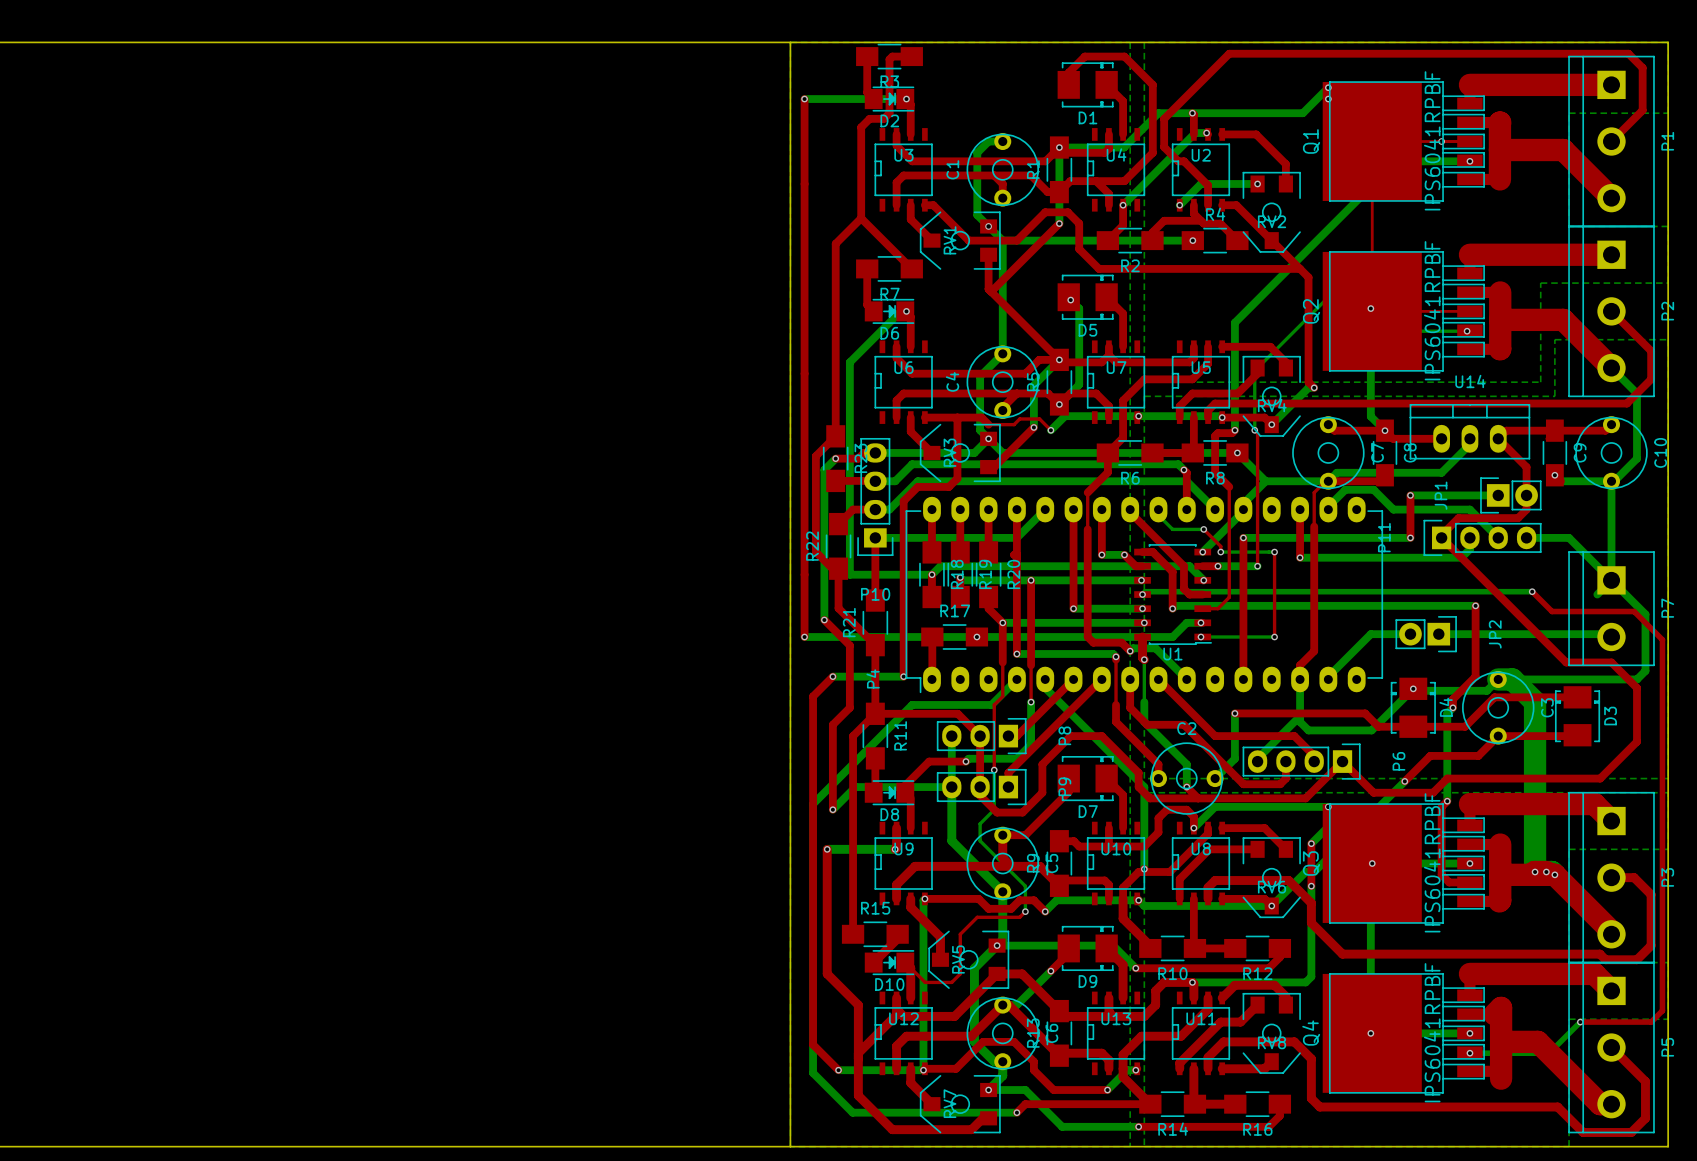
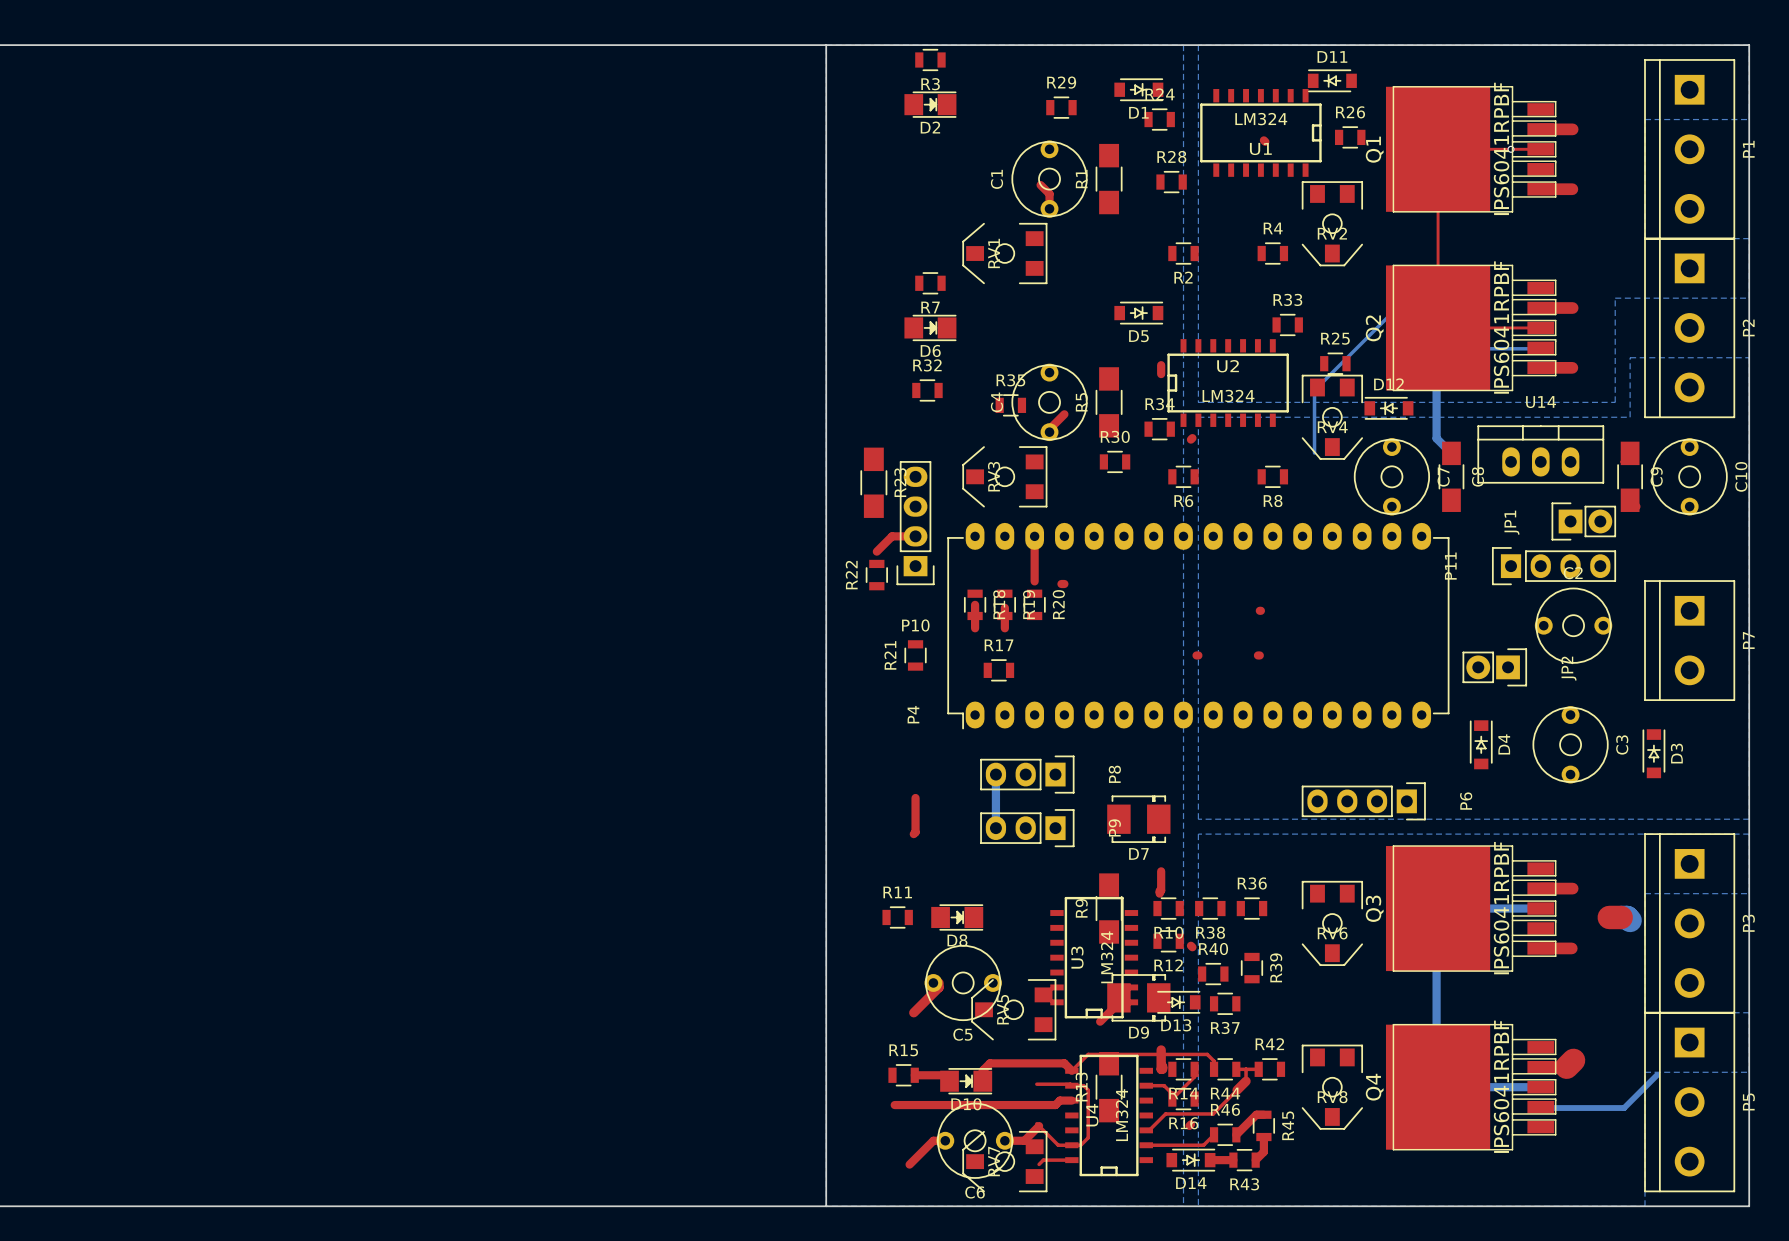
R3 footprint: [856, 43, 923, 70] -> [915, 48, 946, 72]
top track: (867, 56) (867, 92) (873, 99) -> none
top track: (911, 56) (892, 56) (889, 59) (889, 113) (883, 118) (869, 118) (861, 127) (861, 218) -> none
D1 footprint: [1057, 62, 1118, 108] -> [1114, 78, 1164, 102]
D11: none -> (1332, 80)
top track: (1068, 84) (1068, 72) (1084, 56) (1124, 56) (1152, 84) (1152, 152) (1124, 181) (1070, 181) (1059, 192) (1047, 192) (1031, 175) (903, 175) (896, 182) (896, 205) -> none
top track: (1106, 84) (1123, 101) (1123, 134) -> none
top track: (1611, 84) (1469, 84) (1469, 103) -> none
via: (1328, 87) -> none
top track: (804, 99) (804, 637) -> none
bottom track: (804, 99) (906, 99) -> none
via: (804, 99) -> none
top track: (906, 99) (910, 104) (910, 134) -> none
via: (906, 99) -> none
bottom track: (1328, 99) (1328, 87) (1302, 113) (1158, 113) (1124, 147) (1059, 147) (1059, 223) -> none
via: (1328, 99) -> none
R29: none -> (1061, 107)
U1 value: none -> LM324 (1261, 119)
R24: none -> (1159, 119)
top track: (1192, 113) (1193, 134) -> none
via: (1192, 113) -> none
top track: (1501, 121) (1499, 179) (1501, 178) -> none
U3 footprint: [874, 128, 933, 212] -> [1050, 896, 1139, 1019]
U4 footprint: [1086, 128, 1146, 212] -> [1065, 1054, 1153, 1177]
U2 footprint: [1171, 128, 1231, 212] -> [1167, 339, 1289, 427]
R26: none -> (1350, 137)
bottom track: (1206, 133) (1195, 133) (1123, 205) -> none
via: (1206, 133) -> none
top track: (896, 134) (896, 145) (912, 161) (1045, 161) (1059, 147) (1064, 152) (1104, 152) (1108, 148) (1108, 134) -> none
top track: (1222, 134) (1256, 134) (1285, 164) (1285, 183) -> none
bottom track: (1002, 141) (988, 141) (977, 152) (977, 215) (1002, 240) -> none
top track: (1611, 141) (1642, 110) (1642, 67) (1628, 53) (1229, 53) (1164, 118) (1164, 147) (1178, 161) (1183, 161) (1208, 185) (1208, 205) -> none
via: (1059, 147) -> none
top track: (1499, 150) (1563, 150) (1611, 198) -> none
bottom track: (1469, 161) (1396, 161) (1234, 322) (1234, 430) -> none
via: (1469, 161) -> none
R28: none -> (1171, 182)
top track: (1096, 181) (1108, 193) (1108, 205) -> none
bottom track: (1257, 183) (1200, 183) (1179, 205) -> none
via: (1257, 183) -> none
top track: (910, 205) (910, 219) (931, 240) -> none
top track: (924, 205) (933, 205) (968, 240) (1016, 240) (1045, 212) (1067, 212) (1079, 223) (1079, 249) (1099, 268) (1300, 268) -> none
top track: (1123, 205) (1123, 225) (1107, 240) -> none
via: (1123, 205) -> none
via: (1179, 205) -> none
top track: (1193, 205) (1193, 213) (1203, 223) (1220, 223) (1237, 240) (1237, 234) -> none
top track: (1222, 205) (1236, 205) (1308, 277) (1308, 382) (1314, 387) -> none
top track: (861, 218) (835, 243) (835, 436) (815, 456) (815, 552) (832, 568) (838, 568) (838, 608) (875, 645) (875, 713) -> none
top track: (861, 218) (911, 268) -> none
top track: (1200, 220) (1164, 220) (1152, 232) (1152, 240) -> none
top track: (1059, 223) (991, 291) -> none
via: (1059, 223) -> none
via: (988, 226) -> none
R2 footprint: [1096, 227, 1164, 254] -> [1168, 242, 1199, 265]
R4 footprint: [1181, 227, 1249, 254] -> [1257, 242, 1289, 265]
bottom track: (1002, 240) (1192, 240) -> none
bottom track: (1002, 240) (1002, 353) (980, 376) (980, 430) (1002, 452) (1237, 452) (1265, 481) -> none
via: (1192, 240) -> none
top track: (988, 254) (988, 289) (1061, 362) (1101, 362) (1108, 355) (1116, 362) (1189, 362) (1193, 358) (1193, 346) -> none
top track: (1611, 254) (1469, 254) (1469, 273) -> none
R7 footprint: [856, 256, 923, 282] -> [915, 272, 946, 295]
top track: (867, 268) (867, 304) (873, 311) -> none
D5 footprint: [1057, 274, 1118, 320] -> [1114, 301, 1164, 325]
top track: (1501, 291) (1499, 349) (1501, 348) -> none
top track: (1106, 297) (1123, 313) (1123, 346) -> none
bottom track: (1070, 300) (1079, 308) (1079, 384) (1059, 404) -> none
via: (1070, 300) -> none
R33: none -> (1287, 324)
via: (1370, 308) -> none
top track: (906, 311) (910, 316) (910, 346) -> none
bottom track: (906, 311) (900, 311) (849, 362) (849, 574) (931, 574) (940, 566) (1189, 566) (1203, 580) -> none
via: (906, 311) -> none
top track: (1611, 311) (1651, 351) (1651, 379) (1626, 403) (1215, 403) (1208, 410) (1208, 417) -> none
top track: (1500, 319) (1563, 319) (1611, 368) -> none
via: (1467, 331) -> none
R25: none -> (1335, 363)
top track: (896, 346) (896, 358) (912, 373) (1025, 373) (1039, 359) (1059, 359) -> none
top track: (1208, 346) (1208, 363) (1192, 379) (1144, 379) (1123, 400) (1123, 437) (1107, 452) (1107, 472) (1087, 492) (1087, 637) (1093, 642) (1121, 642) (1130, 651) -> none
top track: (1222, 346) (1270, 346) (1285, 362) (1285, 368) -> none
bottom track: (1059, 359) (1033, 385) (1033, 427) -> none
via: (1059, 359) -> none
top track: (1257, 368) (1257, 373) (1237, 393) (1192, 393) (1179, 406) (1179, 417) -> none
bottom track: (1611, 368) (1636, 393) (1636, 458) (1614, 481) (1560, 481) (1554, 475) -> none
R32: none -> (927, 390)
U2 value: none -> LM324 (1228, 395)
U6: (903, 382) -> none
U7: (1116, 382) -> none
U5: (1200, 382) -> none
R35: none -> (1010, 405)
bottom track: (1314, 387) (1308, 387) (1271, 424) -> none
via: (1314, 387) -> none
D12: none -> (1388, 408)
via: (1059, 404) -> none
R34: none -> (1159, 429)
via: (1138, 416) -> none
top track: (896, 417) (896, 400) (903, 393) (1048, 393) (1059, 404) (1070, 393) (1096, 393) (1108, 406) (1108, 417) -> none
top track: (910, 417) (910, 431) (931, 452) -> none
top track: (924, 417) (981, 417) (988, 424) (1014, 424) (1019, 418) (1039, 418) (1050, 430) -> none
top track: (957, 417) (957, 478) (948, 486) (917, 486) (903, 501) (903, 676) -> none
top track: (1193, 417) (1193, 451) -> none
top track: (1222, 417) (1264, 417) (1271, 424) -> none
bottom track: (1222, 417) (1065, 416) (1050, 430) -> none
via: (1222, 417) -> none
via: (1271, 424) -> none
top track: (1328, 424) (1334, 430) (1385, 430) (1393, 438) -> none
top track: (1611, 424) (1605, 430) (1506, 430) (1498, 438) (1526, 467) (1526, 509) (1518, 518) (1458, 518) (1441, 535) (1441, 537) (1566, 662) (1611, 662) (1636, 687) (1636, 741) (1600, 778) (1447, 778) (1433, 792) (1373, 792) (1342, 761) (1305, 798) (1149, 798) (1138, 787) (1138, 772) (1101, 736) (1070, 736) (1042, 764) (1042, 792) (1022, 812) (997, 812) (980, 795) (980, 736) (957, 713) (875, 713) -> none
top track: (1033, 427) (994, 467) (988, 467) -> none
via: (1033, 427) -> none
via: (1050, 430) -> none
top track: (1234, 430) (1232, 433) (1217, 433) (1215, 435) (1215, 472) (1229, 486) (1229, 597) (1217, 608) (1202, 608) -> none
via: (1234, 430) -> none
top track: (1254, 430) (1257, 433) (1257, 566) -> none
via: (1254, 430) -> none
via: (1385, 430) -> none
bottom track: (988, 438) (974, 452) (875, 452) -> none
via: (988, 438) -> none
R30: none -> (1115, 461)
top track: (1393, 438) (1441, 438) -> none
bottom track: (1469, 438) (1469, 444) (1441, 472) (1336, 472) (1328, 481) (1265, 481) -> none
R6 footprint: [1096, 440, 1164, 466] -> [1168, 465, 1199, 488]
R8 footprint: [1181, 440, 1249, 466] -> [1257, 465, 1289, 488]
top track: (875, 452) (864, 452) (858, 458) (835, 458) -> none
top track: (1152, 452) (1192, 452) -> none
via: (1237, 452) -> none
bottom track: (835, 458) (824, 469) (824, 620) -> none
via: (835, 458) -> none
top track: (1183, 469) (1186, 472) (1186, 509) -> none
bottom track: (1183, 469) (1178, 464) (912, 464) (895, 481) (875, 481) -> none
via: (1183, 469) -> none
top track: (1385, 475) (1378, 481) (1325, 481) (1314, 492) (1314, 651) (1300, 665) (1300, 679) -> none
via: (1554, 475) -> none
top track: (835, 480) (875, 481) -> none
bottom track: (1265, 481) (1243, 503) (1243, 511) (1202, 552) -> none
bottom track: (1611, 481) (1611, 580) (1597, 594) -> none
top track: (1410, 495) (1410, 537) -> none
bottom track: (1410, 495) (1498, 495) -> none
via: (1410, 495) -> none
bottom track: (875, 509) (889, 509) (917, 481) (1186, 481) (1215, 509) -> none
top track: (931, 509) (931, 552) -> none
top track: (960, 509) (960, 552) -> none
top track: (1016, 509) (1016, 653) -> none
bottom track: (1045, 509) (1016, 537) (875, 537) -> none
top track: (1073, 509) (1073, 608) -> none
top track: (1101, 509) (1101, 554) -> none
top track: (1130, 509) (1130, 512) (1183, 566) (1183, 588) (1189, 594) (1202, 594) -> none
bottom track: (1158, 509) (1158, 515) (1172, 529) (1203, 529) -> none
top track: (1300, 509) (1300, 557) -> none
bottom track: (1328, 509) (1328, 506) (1345, 489) (1373, 489) (1393, 509) (1469, 509) (1498, 537) -> none
R22 footprint: [825, 512, 852, 580] -> [865, 559, 888, 591]
top track: (1203, 529) (1220, 546) (1220, 552) -> none
via: (1203, 529) -> none
top track: (875, 537) (875, 600) -> none
top track: (1243, 537) (1243, 679) -> none
bottom track: (1243, 537) (1410, 537) -> none
via: (1243, 537) -> none
via: (1410, 537) -> none
bottom track: (1469, 537) (1469, 549) (1461, 557) (1300, 557) -> none
bottom track: (1526, 537) (1569, 537) (1645, 614) (1645, 670) (1636, 679) (1498, 679) -> none
R18 footprint: [919, 541, 945, 609] -> [963, 589, 987, 621]
R19 footprint: [947, 541, 974, 609] -> [993, 589, 1017, 621]
R20 footprint: [975, 541, 1002, 609] -> [1023, 589, 1046, 621]
U1 footprint: [1134, 544, 1212, 645] -> [1200, 89, 1322, 177]
top track: (1142, 552) (1152, 552) (1172, 571) (1172, 608) -> none
via: (1202, 552) -> none
bottom track: (1220, 552) (1274, 552) -> none
via: (1220, 552) -> none
top track: (1274, 552) (1274, 637) -> none
via: (1274, 552) -> none
bottom track: (1101, 554) (1124, 554) -> none
via: (1101, 554) -> none
top track: (1124, 554) (1135, 566) (1142, 566) -> none
via: (1124, 554) -> none
via: (1300, 557) -> none
top track: (1202, 566) (1217, 566) -> none
bottom track: (1217, 566) (1257, 566) -> none
via: (1217, 566) -> none
via: (1257, 566) -> none
via: (931, 574) -> none
bottom track: (960, 577) (963, 580) (1141, 580) -> none
via: (960, 577) -> none
top track: (1031, 580) (1031, 702) -> none
via: (1031, 580) -> none
via: (1141, 580) -> none
via: (1203, 580) -> none
R21 footprint: [862, 589, 889, 657] -> [904, 640, 927, 671]
top track: (1532, 591) (1552, 611) (1634, 611) (1662, 639) (1662, 1010) (1651, 1022) (1580, 1022) -> none
bottom track: (1532, 591) (1145, 591) (1142, 594) -> none
via: (1532, 591) -> none
via: (1142, 594) -> none
top track: (988, 597) (988, 608) (1002, 622) (1002, 696) (994, 704) (994, 770) -> none
top track: (1475, 605) (1475, 676) (1452, 699) (1452, 707) -> none
bottom track: (1475, 605) (1175, 605) (1172, 608) -> none
via: (1475, 605) -> none
bottom track: (1073, 608) (1142, 608) -> none
via: (1073, 608) -> none
via: (1142, 608) -> none
via: (1172, 608) -> none
top track: (824, 620) (849, 645) (849, 707) (832, 724) (832, 809) -> none
via: (824, 620) -> none
bottom track: (1002, 622) (1144, 622) -> none
via: (1002, 622) -> none
via: (1144, 622) -> none
bottom track: (1200, 622) (1186, 622) (1172, 637) (804, 637) -> none
via: (1200, 622) -> none
R17 footprint: [921, 624, 989, 650] -> [983, 659, 1015, 682]
bottom track: (1410, 634) (1370, 634) (1328, 676) (1328, 679) -> none
bottom track: (1438, 634) (1608, 634) (1611, 637) -> none
via: (804, 637) -> none
top track: (932, 637) (931, 679) -> none
via: (976, 637) -> none
top track: (1142, 637) (1142, 657) (1144, 659) -> none
bottom track: (1200, 637) (1274, 637) -> none
via: (1200, 637) -> none
via: (1274, 637) -> none
bottom track: (1130, 651) (1133, 648) (1155, 648) (1186, 679) -> none
via: (1130, 651) -> none
bottom track: (1016, 653) (1113, 653) (1116, 656) -> none
via: (1016, 653) -> none
U1 name position: U1 (1172, 654) -> U1 (1260, 148)
top track: (1116, 656) (1116, 721) (1158, 764) (1158, 778) -> none
via: (1116, 656) -> none
bottom track: (1144, 659) (1144, 721) (1186, 764) (1186, 787) -> none
via: (1144, 659) -> none
top track: (832, 676) (813, 696) (813, 1044) (838, 1070) -> none
bottom track: (832, 676) (903, 676) -> none
via: (832, 676) -> none
via: (903, 676) -> none
D4 footprint: [1390, 677, 1436, 738] -> [1469, 720, 1493, 770]
bottom track: (1016, 679) (991, 704) (912, 704) (813, 804) (813, 1073) (852, 1112) (1016, 1112) -> none
bottom track: (1045, 679) (1045, 687) (1144, 787) (1144, 869) -> none
top track: (1073, 679) (1016, 736) (1008, 736) -> none
top track: (1101, 679) (1008, 772) (1008, 787) -> none
top track: (1130, 679) (1130, 707) (1147, 724) (1183, 724) (1243, 784) (1280, 784) (1285, 778) (1285, 761) -> none
top track: (1158, 679) (1215, 736) (1294, 736) (1314, 755) (1314, 761) -> none
bottom track: (1300, 679) (1300, 721) (1308, 730) (1371, 730) (1413, 688) (1415, 690) (1486, 690) (1498, 679) -> none
bottom track: (1498, 679) (1512, 679) (1535, 702) (1535, 872) -> none
D3 footprint: [1554, 686, 1601, 747] -> [1642, 729, 1666, 779]
via: (1413, 688) -> none
top track: (1577, 697) (1494, 697) (1465, 726) (1378, 726) (1365, 713) (1234, 713) -> none
R11 footprint: [862, 702, 889, 770] -> [882, 906, 913, 929]
bottom track: (1031, 702) (1031, 744) (1016, 758) (968, 758) (965, 761) -> none
via: (1031, 702) -> none
bottom track: (1452, 707) (1447, 713) (1447, 801) -> none
via: (1452, 707) -> none
top track: (875, 713) (853, 736) (853, 934) -> none
bottom track: (1234, 713) (1234, 758) (1215, 778) -> none
via: (1234, 713) -> none
bottom track: (1300, 716) (1257, 758) (1257, 761) -> none
R11 name position: R11 (900, 735) -> R11 (897, 892)
top track: (1577, 735) (1498, 736) (1478, 755) (1430, 755) (1404, 781) -> none
top track: (965, 761) (929, 761) (905, 785) (905, 792) -> none
via: (965, 761) -> none
bottom track: (994, 770) (994, 809) (980, 823) (980, 840) (1025, 886) (1025, 911) -> none
via: (994, 770) -> none
top track: (1068, 778) (1068, 791) (1025, 835) (1002, 835) (1002, 857) (1011, 866) -> none
top track: (1106, 778) (1123, 795) (1123, 828) -> none
C2 position: (1186, 778) -> (1573, 625)
bottom track: (1404, 781) (1314, 872) (1305, 872) (1271, 905) (1144, 905) (1138, 900) (1056, 900) (1045, 911) -> none
via: (1404, 781) -> none
top track: (1186, 787) (1198, 798) -> none
via: (1186, 787) -> none
D8 position: (889, 792) -> (957, 917)
top track: (910, 798) (910, 828) -> none
top track: (1447, 801) (1441, 806) (1441, 874) (1449, 882) (1469, 882) -> none
via: (1447, 801) -> none
via: (1328, 806) -> none
bottom track: (832, 809) (855, 787) (951, 787) (951, 840) (1002, 891) (1002, 939) (974, 968) (974, 1041) (994, 1061) (1002, 1061) (1002, 1075) (988, 1090) (1025, 1090) (1062, 1126) (1138, 1126) -> none
via: (832, 809) -> none
top track: (1611, 821) (1594, 804) (1469, 804) (1469, 825) -> none
top track: (896, 828) (895, 849) -> none
top track: (1193, 828) (1193, 816) (1186, 809) (1166, 809) (1158, 818) (1158, 832) (1144, 846) (1079, 846) (1073, 841) (1059, 841) -> none
bottom track: (1193, 828) (1215, 806) (1328, 806) (1328, 826) (1311, 843) -> none
via: (1193, 828) -> none
top track: (1208, 828) (1208, 833) (1169, 872) (1138, 872) (1123, 887) (1123, 918) (1150, 945) (1150, 948) -> none
top track: (1222, 828) (1264, 828) (1285, 849) -> none
top track: (1311, 843) (1311, 886) -> none
via: (1311, 843) -> none
top track: (1501, 843) (1499, 901) (1501, 903) -> none
top track: (827, 849) (827, 973) (858, 1005) (858, 1095) (892, 1129) (971, 1129) (982, 1118) (988, 1118) -> none
bottom track: (827, 849) (895, 849) -> none
via: (827, 849) -> none
via: (895, 849) -> none
top track: (1257, 849) (1209, 849) (1179, 879) (1179, 898) -> none
U9: (903, 863) -> none
C5 rotation: 0° (1002, 863) -> 90° clockwise (963, 982)
C5 position: (1002, 863) -> (963, 982)
U10: (1116, 863) -> none
R38: none -> (1210, 908)
R36: none -> (1251, 908)
U8: (1200, 863) -> none
via: (1372, 863) -> none
via: (1469, 863) -> none
via: (1144, 869) -> none
via: (1535, 872) -> none
via: (1546, 872) -> none
top track: (1500, 874) (1554, 874) (1611, 931) (1611, 934) -> none
via: (1554, 874) -> none
top track: (1611, 877) (1634, 877) (1651, 894) (1651, 945) (1636, 959) (1605, 959) (1599, 954) (1342, 954) (1311, 922) (1311, 903) (1288, 880) (1215, 880) (1208, 887) (1208, 898) -> none
bottom track: (1311, 886) (1311, 976) (1305, 982) (1192, 982) -> none
via: (1311, 886) -> none
top track: (896, 898) (896, 884) (914, 866) (1039, 866) (1059, 885) (1064, 880) (1104, 880) (1108, 884) (1108, 898) -> none
top track: (910, 898) (910, 907) (940, 937) (940, 959) -> none
top track: (924, 898) (978, 898) (988, 908) (1011, 908) (1019, 900) (1033, 900) (1045, 911) -> none
bottom track: (924, 898) (923, 1070) (838, 1070) -> none
via: (924, 898) -> none
top track: (1193, 898) (1193, 947) (1235, 948) -> none
top track: (1222, 898) (1264, 898) (1271, 905) -> none
via: (1138, 900) -> none
via: (1271, 905) -> none
U3 value: none -> LM324 (1107, 957)
top track: (1025, 911) (1019, 917) (977, 917) (960, 934) (960, 973) (951, 982) (925, 982) (905, 962) (910, 968) (910, 998) -> none
via: (1025, 911) -> none
via: (1045, 911) -> none
R39: none -> (1251, 968)
R15 footprint: [841, 921, 909, 948] -> [888, 1064, 919, 1087]
R40: none -> (1213, 974)
R10 footprint: [1139, 935, 1207, 962] -> [1153, 897, 1184, 920]
R12 footprint: [1224, 935, 1292, 962] -> [1153, 930, 1184, 953]
bottom track: (997, 945) (1113, 945) (1135, 968) -> none
via: (997, 945) -> none
top track: (1106, 948) (1123, 964) (1123, 998) -> none
top track: (1279, 948) (1279, 957) (1268, 968) (1135, 968) -> none
D13: none -> (1176, 1002)
R37: none -> (1225, 1003)
D10 position: (889, 962) -> (966, 1081)
via: (1135, 968) -> none
bottom track: (1050, 971) (1016, 1005) (1002, 1005) -> none
via: (1050, 971) -> none
top track: (1192, 982) (1164, 982) (1155, 990) (1155, 1005) (1144, 1016) (1064, 1016) (1022, 973) (997, 973) (954, 1016) (903, 1016) (896, 1009) -> none
via: (1192, 982) -> none
top track: (1193, 983) (1193, 998) -> none
top track: (1611, 990) (1594, 973) (1469, 973) (1469, 995) -> none
top track: (896, 998) (896, 1012) (899, 1012) (858, 1053) -> none
top track: (1208, 998) (1208, 1009) (1189, 1027) -> (1246, 1069) (1246, 1081)
top track: (1222, 998) (1234, 985) (1274, 985) (1285, 996) (1285, 1005) -> none
top track: (1257, 1005) (1240, 1022) (1220, 1022) (1179, 1063) (1179, 1068) -> none
top track: (1494, 1014) (1501, 1007) (1501, 1078) (1493, 1071) (1469, 1071) -> none
top track: none -> (1194, 1069) (1194, 1076) (1172, 1099) (1172, 1093) (1164, 1085) (1146, 1085)
top track: none -> (1214, 1069) (1214, 1061) (1207, 1054) (1088, 1054) (1071, 1070) (1064, 1063) (989, 1063) (982, 1070) (982, 1081)
R44: none -> (1225, 1069)
top track: none -> (1236, 1069) (1258, 1069)
R42: none -> (1269, 1069)
top track: none -> (914, 1075) (943, 1075) (949, 1081)
via: (1580, 1022) -> none
top track: none -> (1036, 1084) (1083, 1085) (1088, 1090) (1088, 1137) (1080, 1145) (1058, 1145) (1036, 1123)
U12: (903, 1033) -> none
C6 rotation: 0° (1002, 1033) -> 90° clockwise (975, 1140)
C6 position: (1002, 1033) -> (975, 1140)
U13: (1116, 1033) -> none
U11: (1200, 1033) -> none
via: (1370, 1033) -> none
via: (1469, 1033) -> none
top track: (1181, 1036) (1141, 1036) (1123, 1054) (1123, 1076) (1150, 1104) (1025, 1104) (1016, 1112) -> (1237, 1090) (1213, 1113) (1165, 1113) (1149, 1130) (1146, 1130)
top track: (1501, 1041) (1537, 1041) (1600, 1104) (1611, 1104) -> none
top track: none -> (1071, 1100) (1059, 1100) (1055, 1105) (894, 1105)
top track: (1611, 1047) (1645, 1081) (1645, 1118) (1631, 1132) (1583, 1132) (1557, 1107) (1319, 1107) (1311, 1098) (1311, 1058) (1294, 1041) (1223, 1041) (1208, 1057) (1208, 1068) -> none
via: (1469, 1053) -> none
U4 value: none -> LM324 (1122, 1115)
top track: none -> (1263, 1114) (1256, 1114) (1236, 1134)
top track: (1271, 1061) (1264, 1068) (1222, 1068) -> none
top track: (896, 1068) (896, 1046) (906, 1036) (971, 1036) (1002, 1005) (1008, 1005) (1059, 1055) (1061, 1053) (1101, 1053) (1108, 1060) (1108, 1068) -> none
top track: (910, 1068) (910, 1082) (931, 1104) -> none
top track: (1193, 1068) (1194, 1104) (1235, 1104) -> none
via: (838, 1070) -> none
top track: (923, 1070) (956, 1068) (982, 1041) (1014, 1041) (1033, 1061) (1033, 1070) (1053, 1090) (1107, 1090) -> none
via: (923, 1070) -> none
top track: none -> (1039, 1126) (1024, 1140) (1004, 1140)
bottom track: (1135, 1070) (1127, 1070) (1107, 1090) -> none
via: (1135, 1070) -> none
R45: none -> (1263, 1125)
top track: none -> (1214, 1134) (1203, 1145) (1146, 1145)
R46: none -> (1225, 1134)
top track: none -> (1263, 1137) (1263, 1151) (1255, 1160)
top track: none -> (945, 1140) (933, 1140) (909, 1164)
via: (988, 1090) -> none
via: (1107, 1090) -> none
R14 footprint: [1139, 1091, 1207, 1118] -> [1168, 1058, 1199, 1081]
R16 footprint: [1224, 1091, 1292, 1118] -> [1168, 1087, 1199, 1111]
top track: none -> (1071, 1160) (1043, 1160) (1039, 1164)
D14: none -> (1190, 1160)
top track: none -> (1210, 1160) (1233, 1160)
R43: none -> (1244, 1160)
top track: (1279, 1104) (1279, 1115) (1268, 1126) (1138, 1126) -> none
via: (1016, 1112) -> none
via: (1138, 1126) -> none

